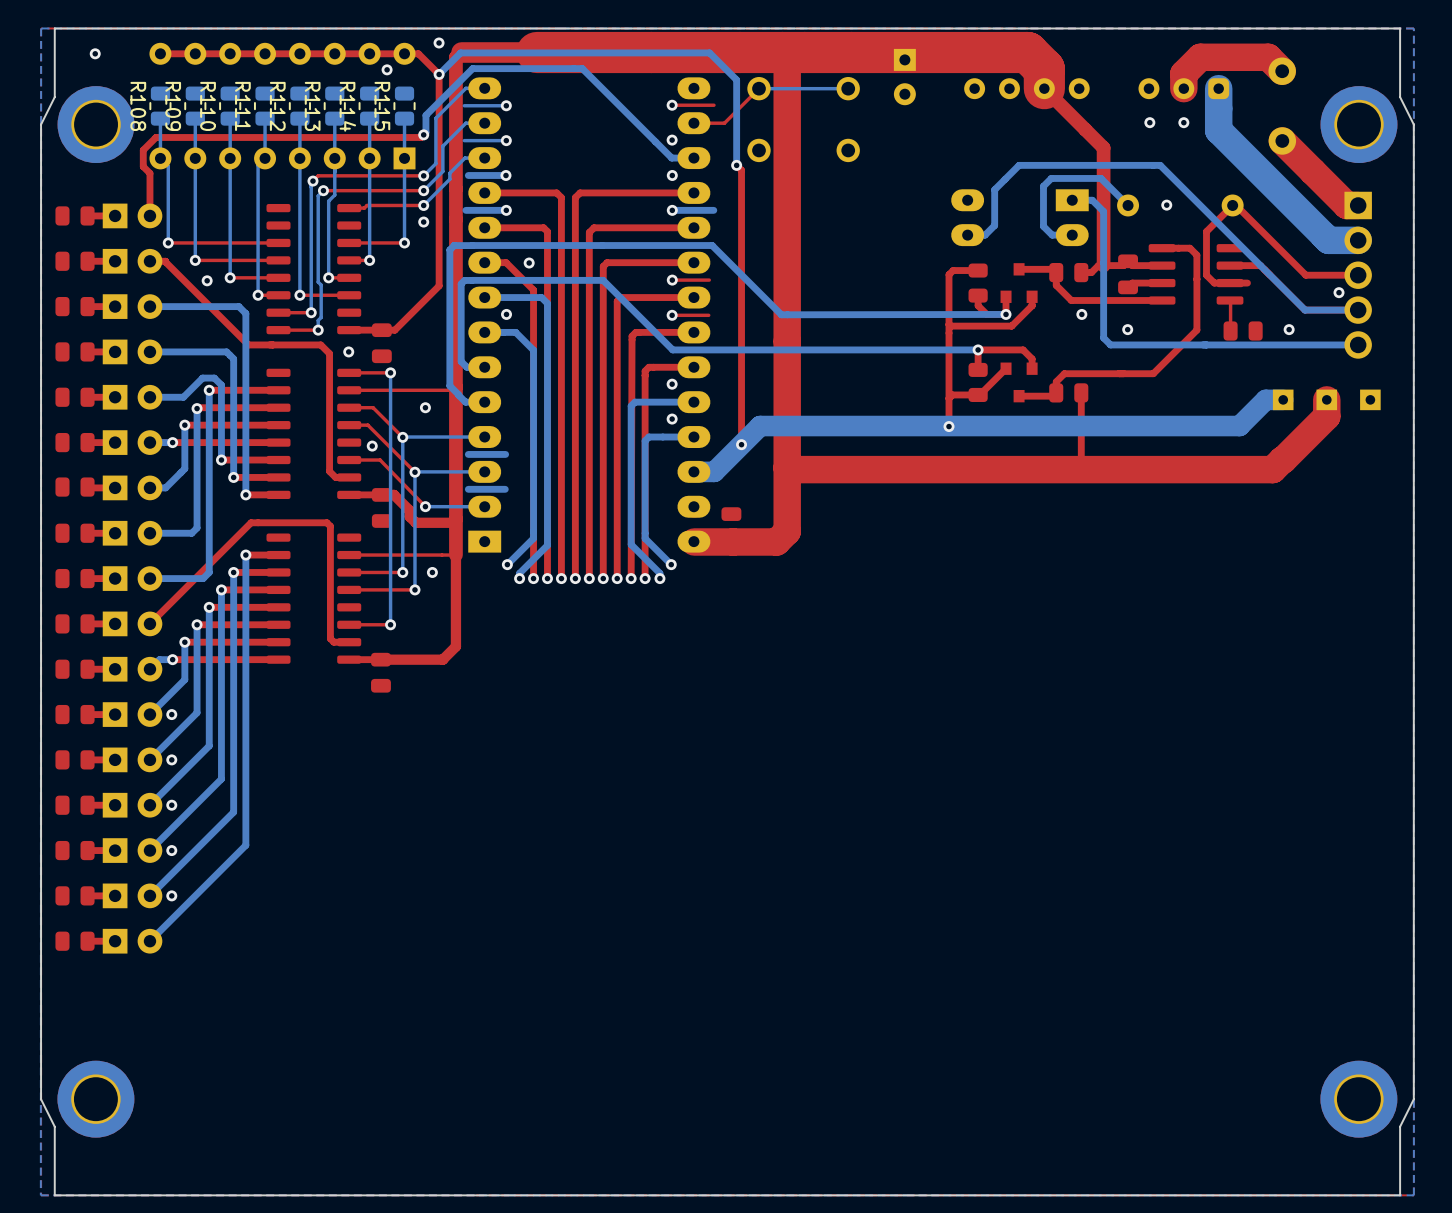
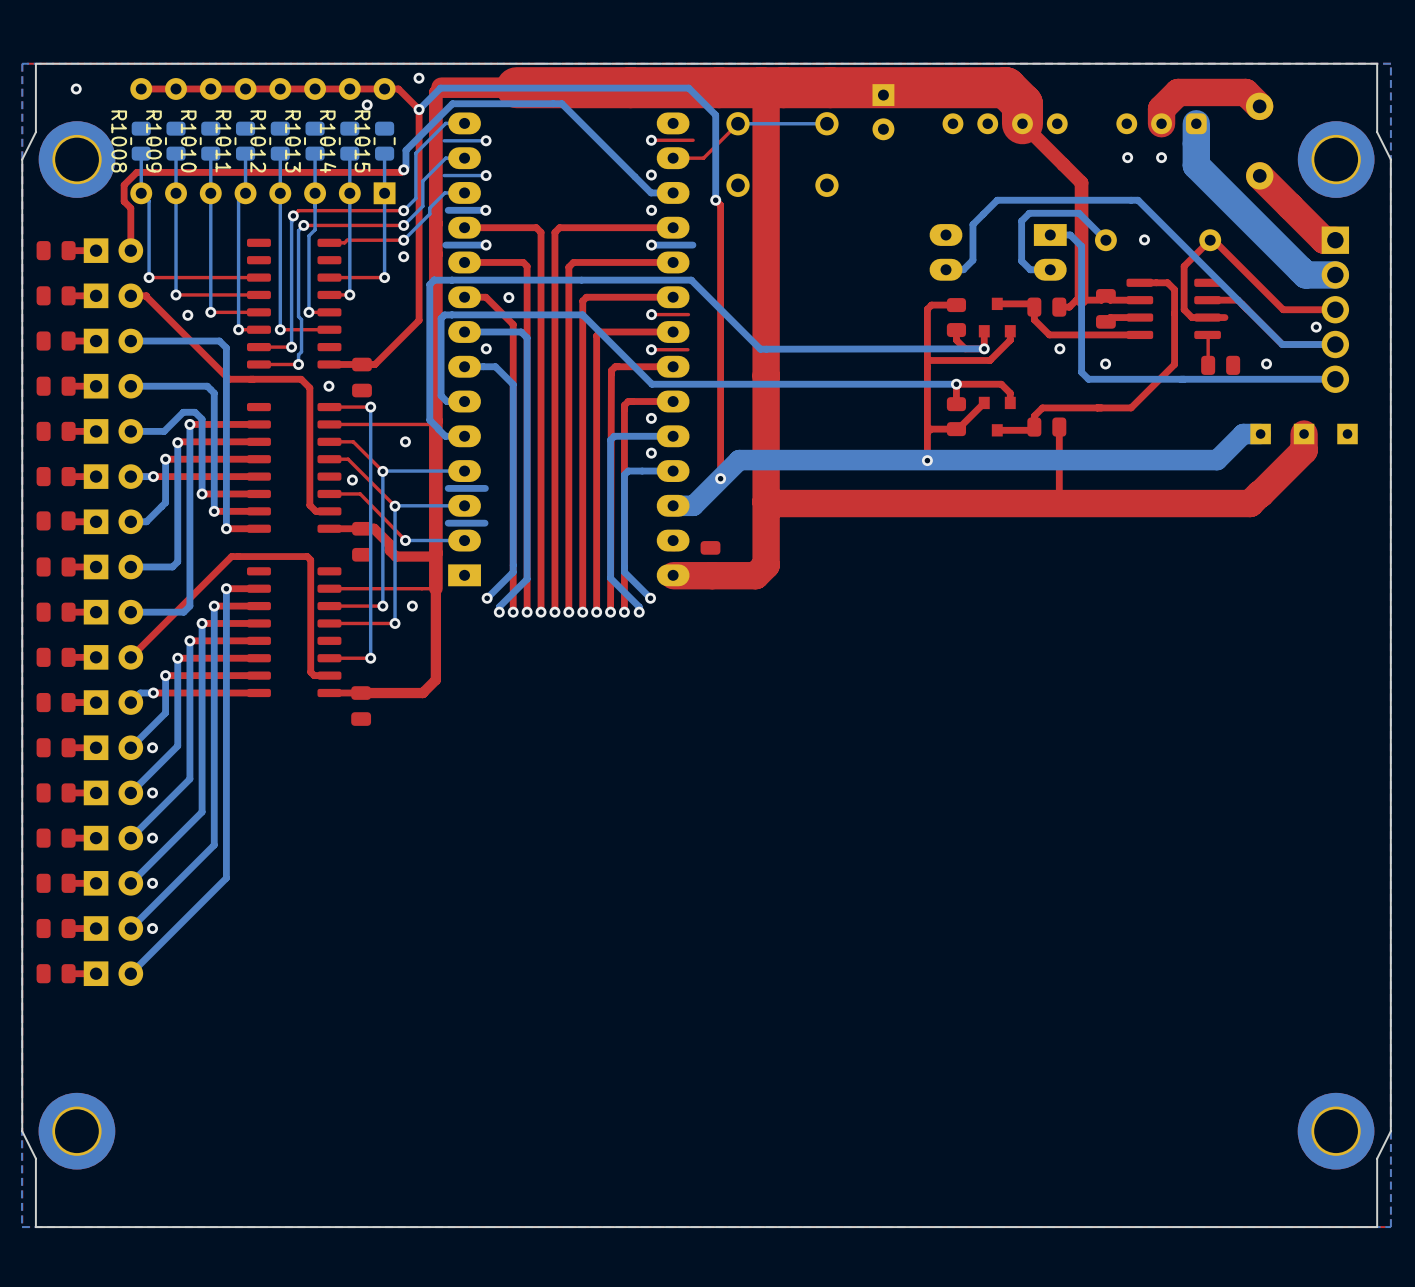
R108 name: R108 (138, 106) -> R1008 (119, 141)
R109 name: R109 (173, 106) -> R1009 (153, 141)
R110 name: R110 (208, 106) -> R1010 (188, 141)
R111 name: R111 (242, 106) -> R1011 (223, 141)
R112 name: R112 (277, 106) -> R1012 (258, 141)
R113 name: R113 (312, 106) -> R1013 (293, 141)
R114 name: R114 (347, 106) -> R1014 (328, 141)
R115 name: R115 (382, 106) -> R1015 (362, 141)

